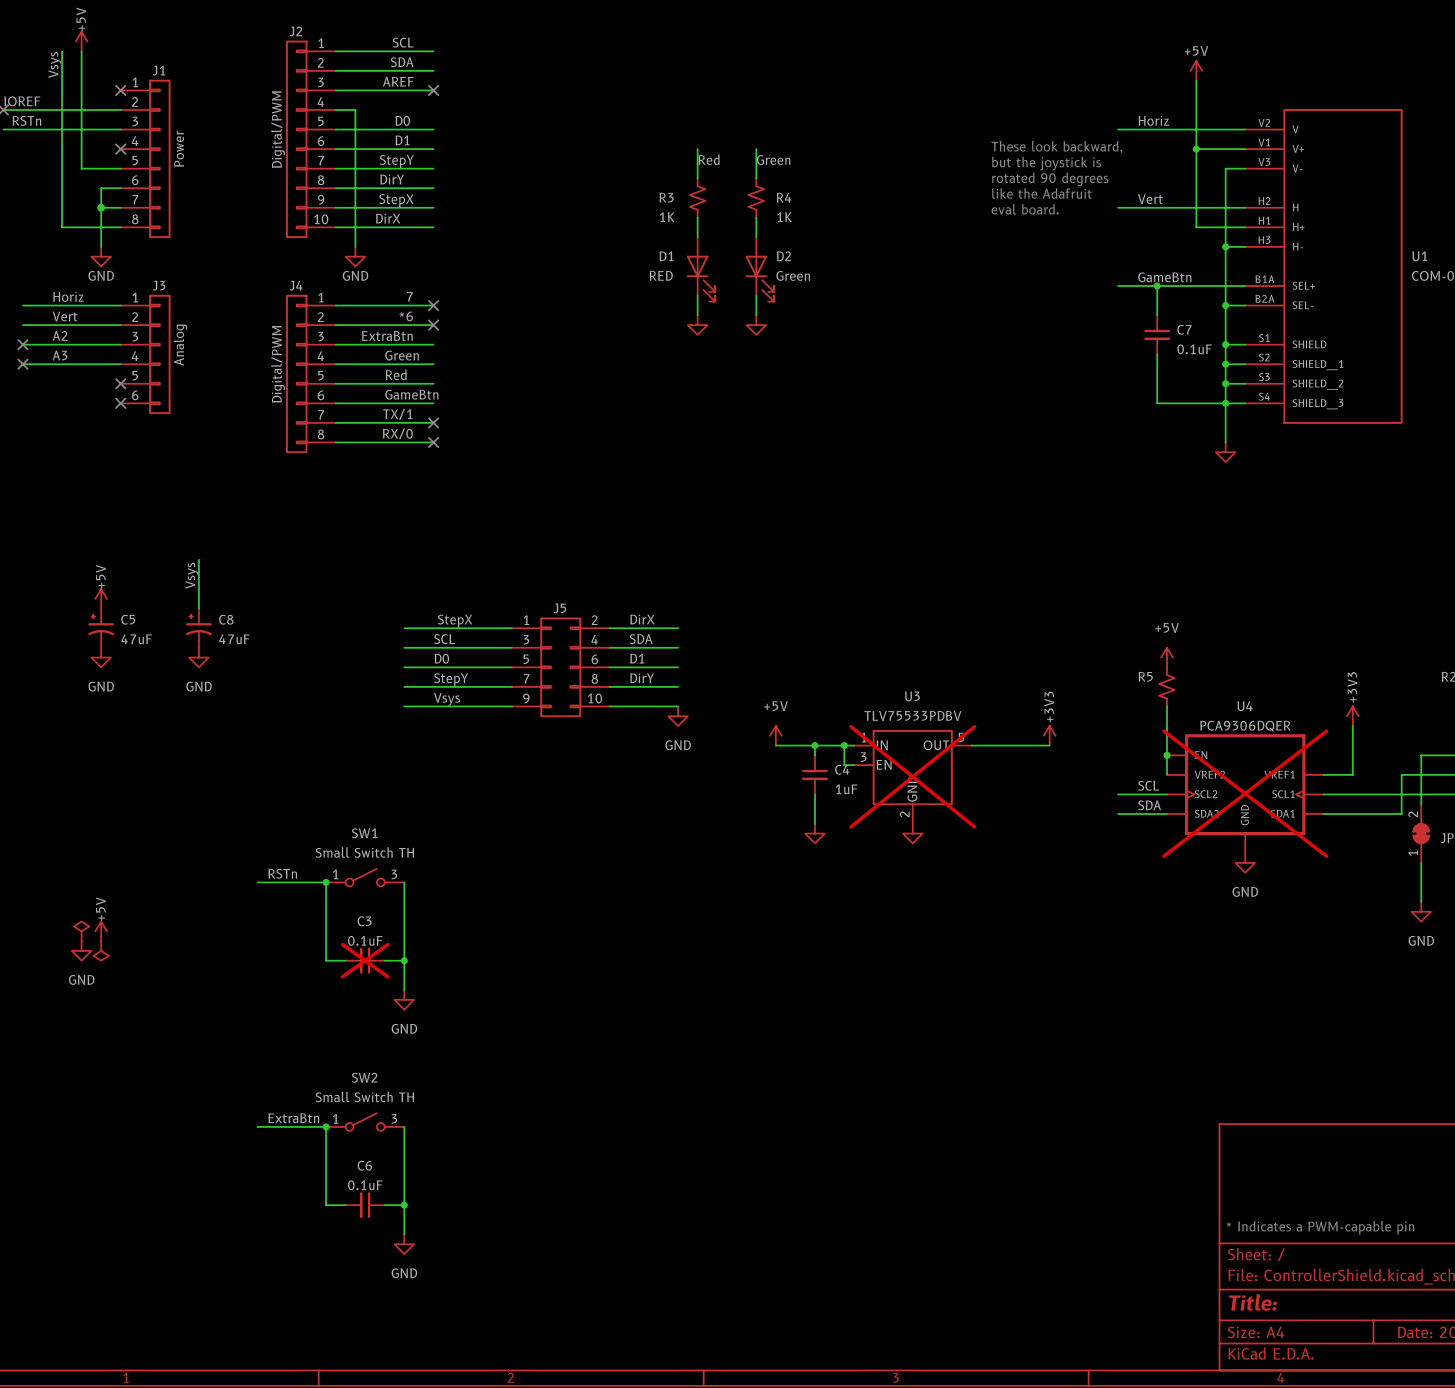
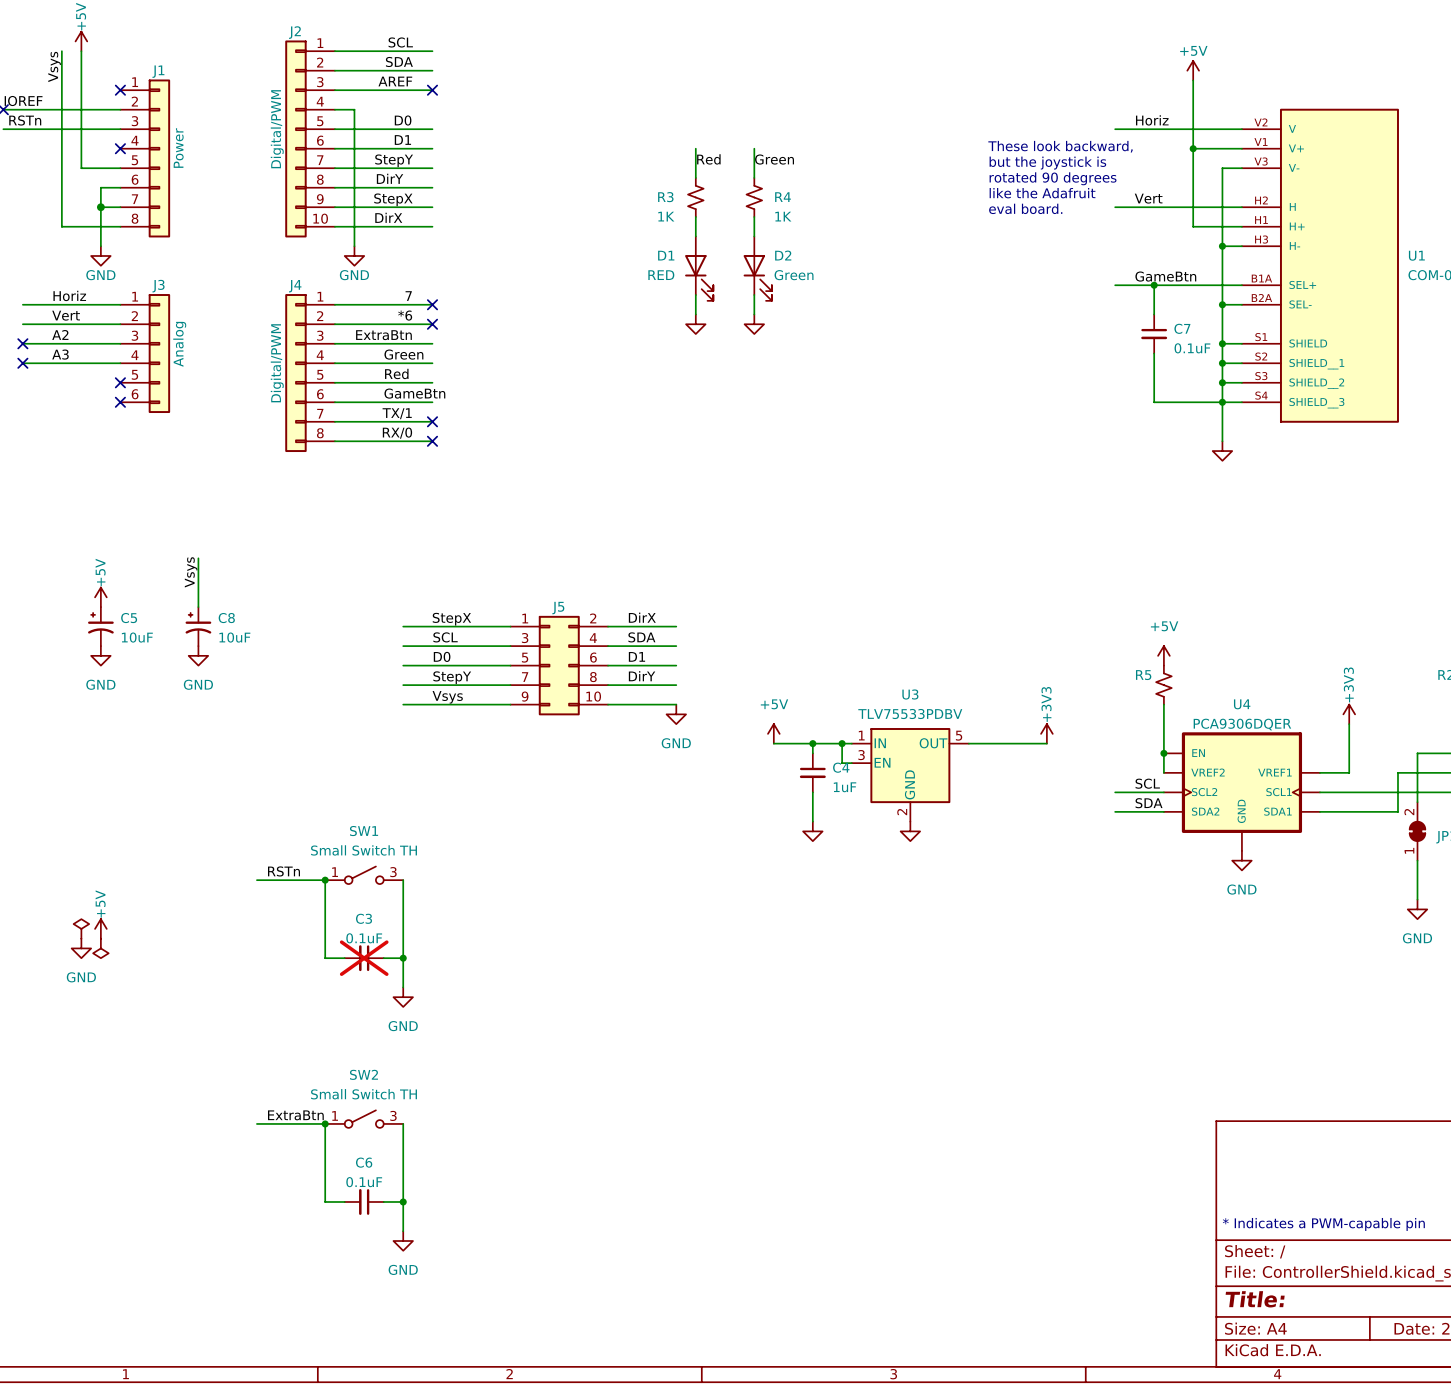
C5 value: 47uF (136, 639) -> 10uF (137, 637)
C8 value: 47uF (234, 639) -> 10uF (234, 637)
U3 do-not-place cross: (912, 776) -> none
U4 do-not-place cross: (1245, 793) -> none

